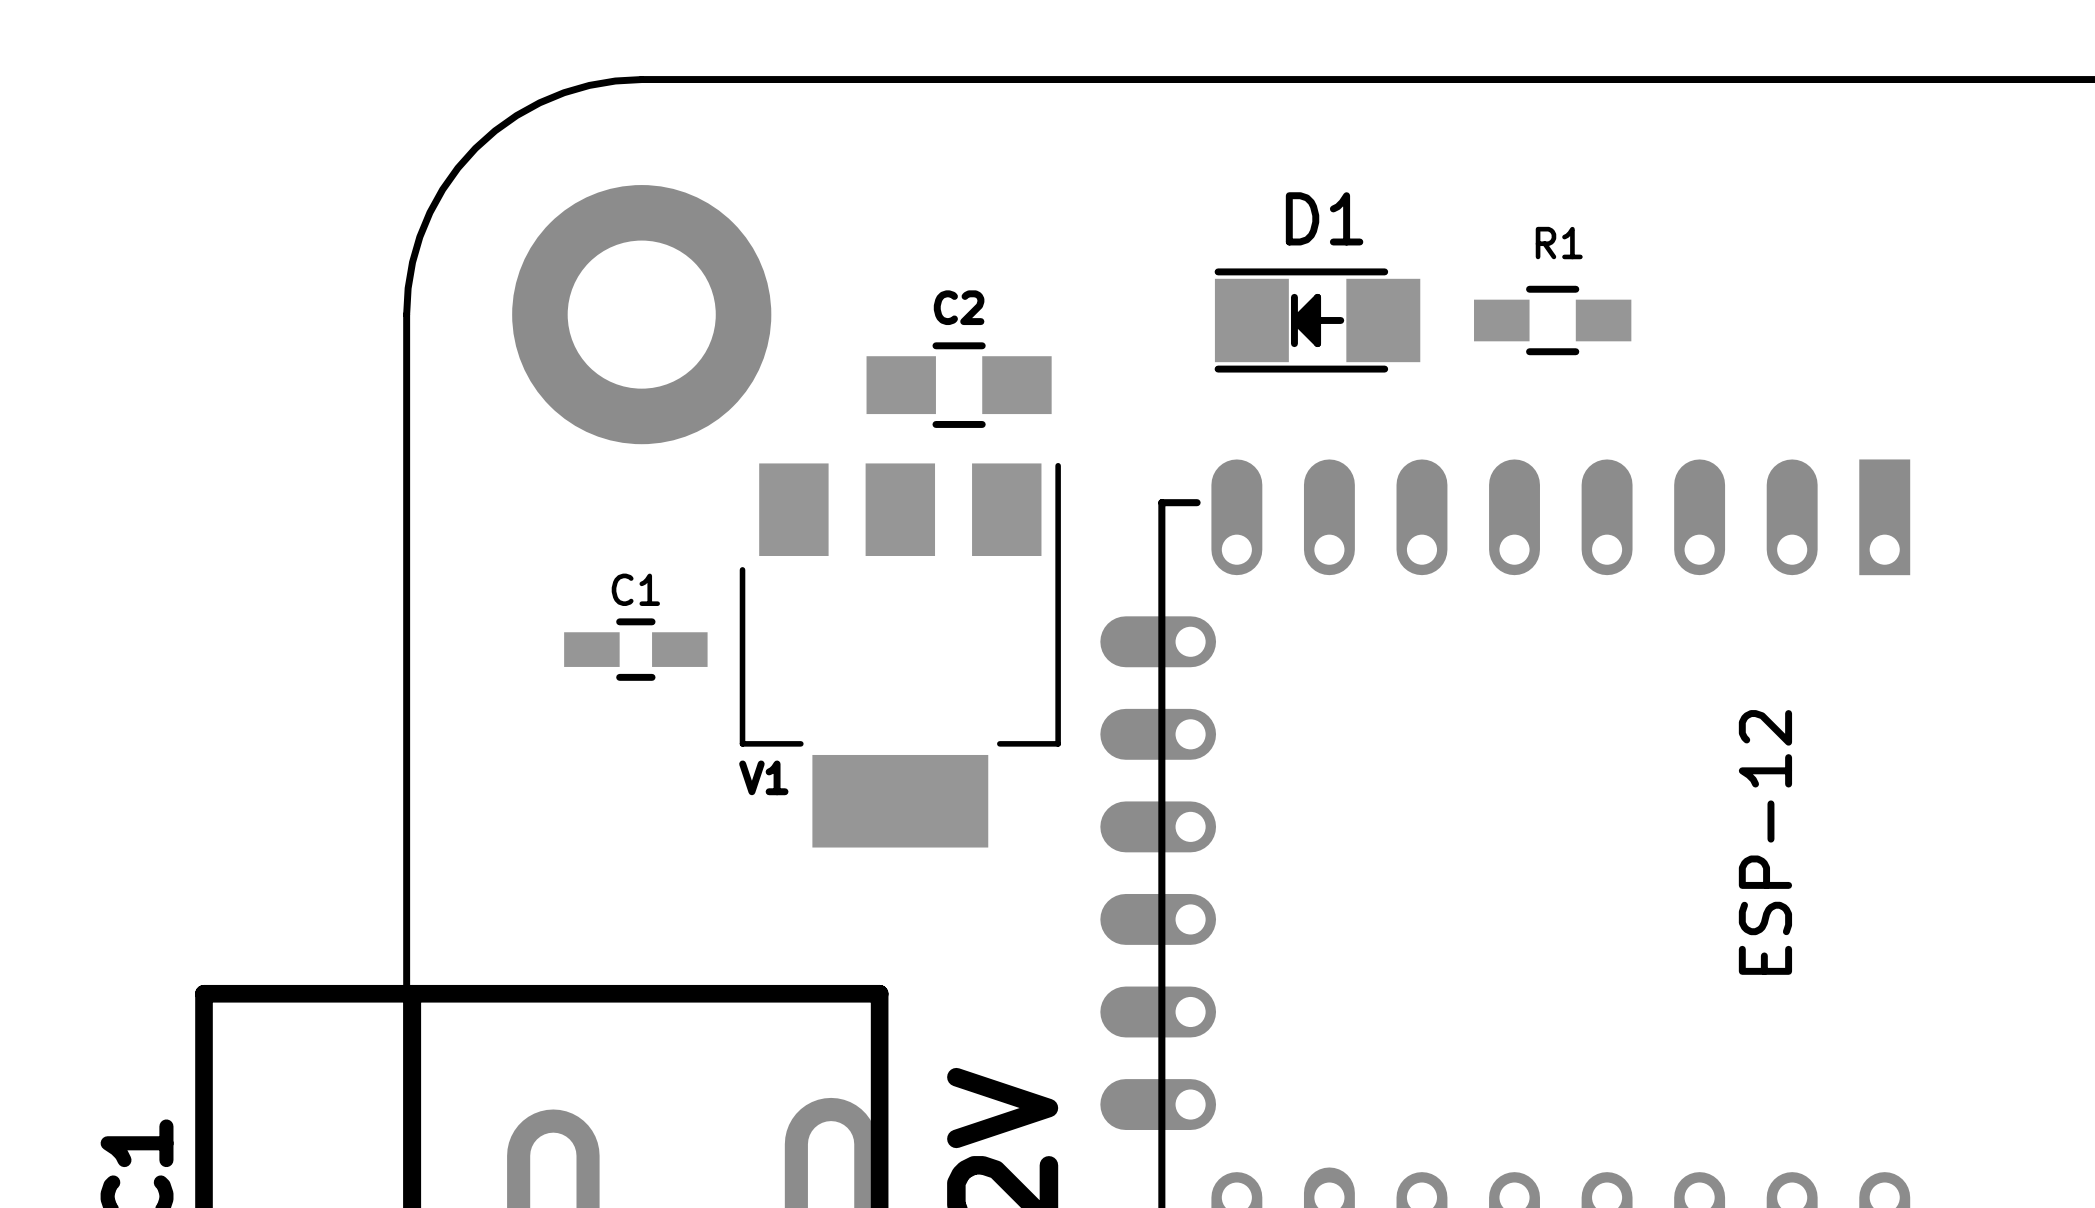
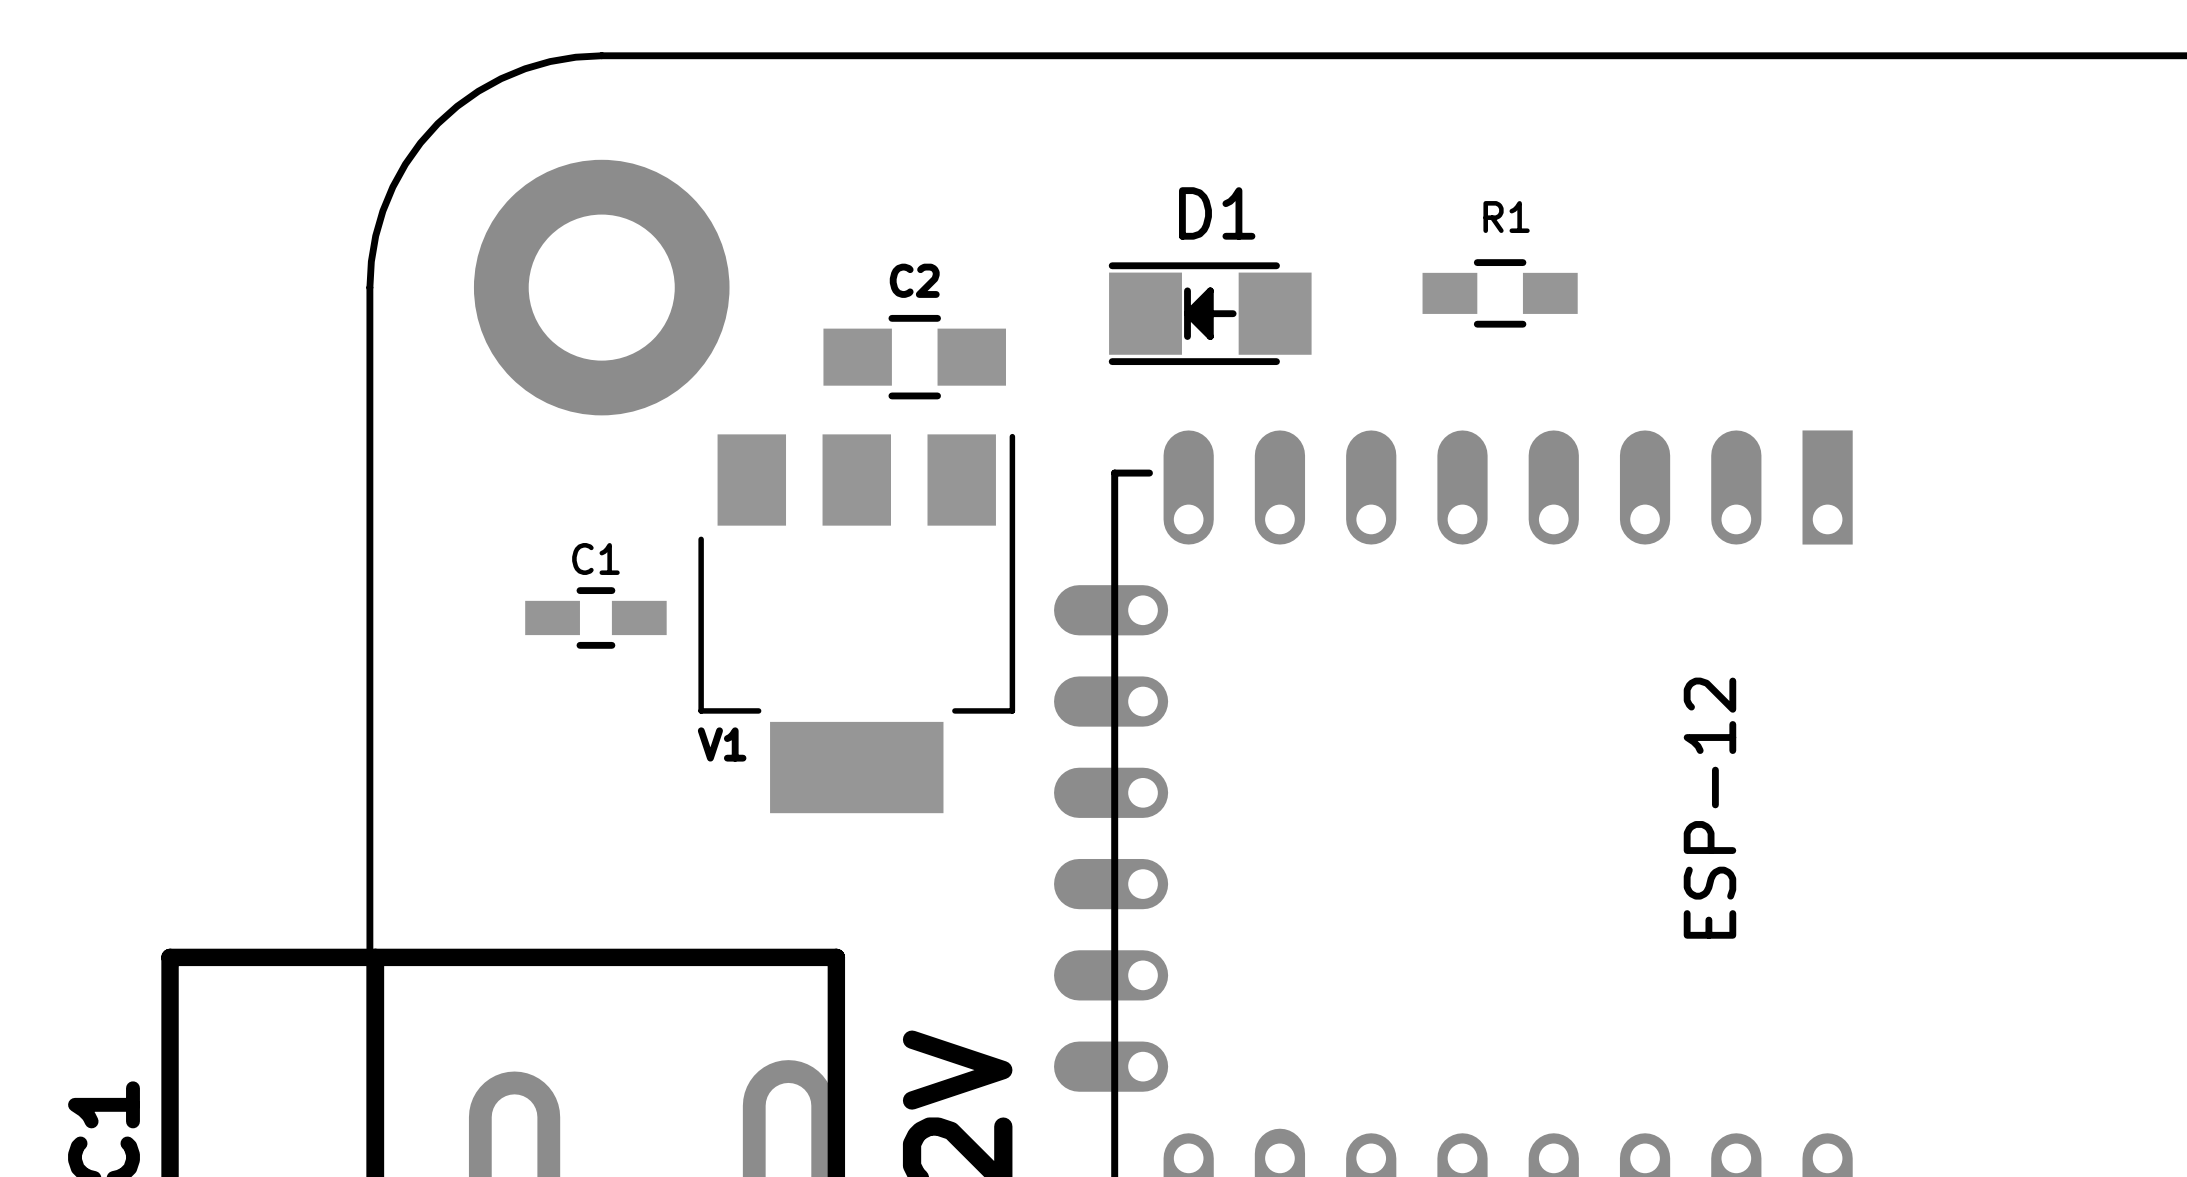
D1 position: (1317, 320) -> (1210, 313)

